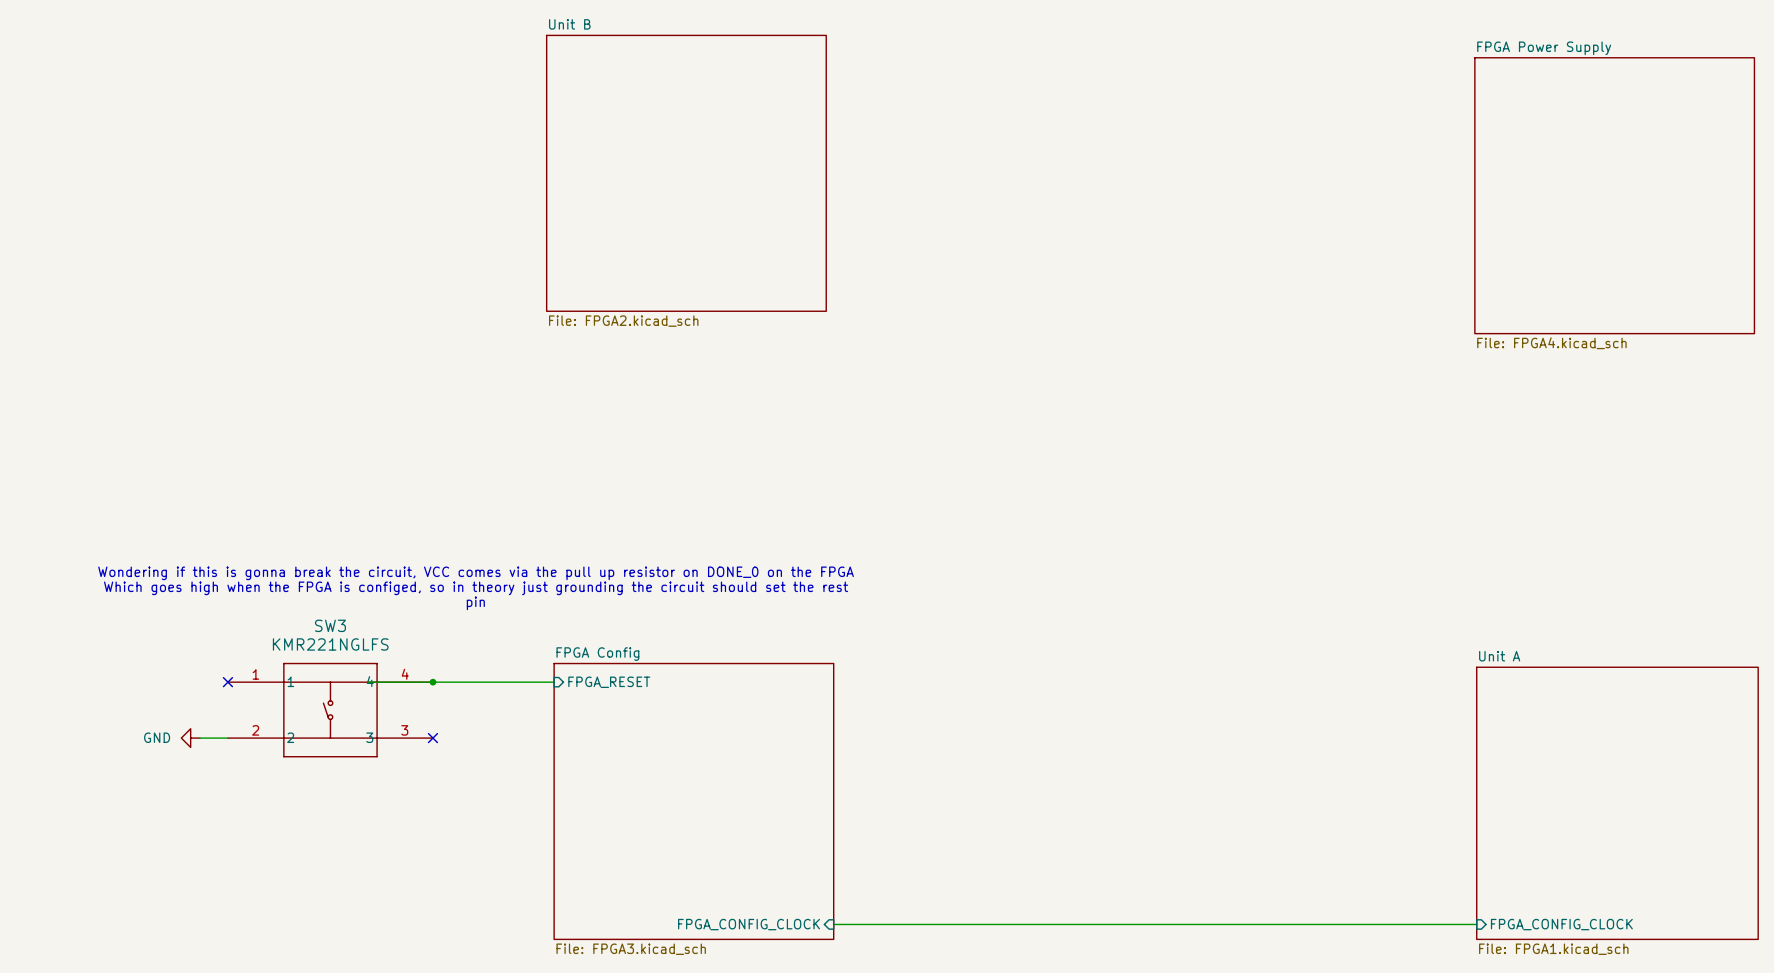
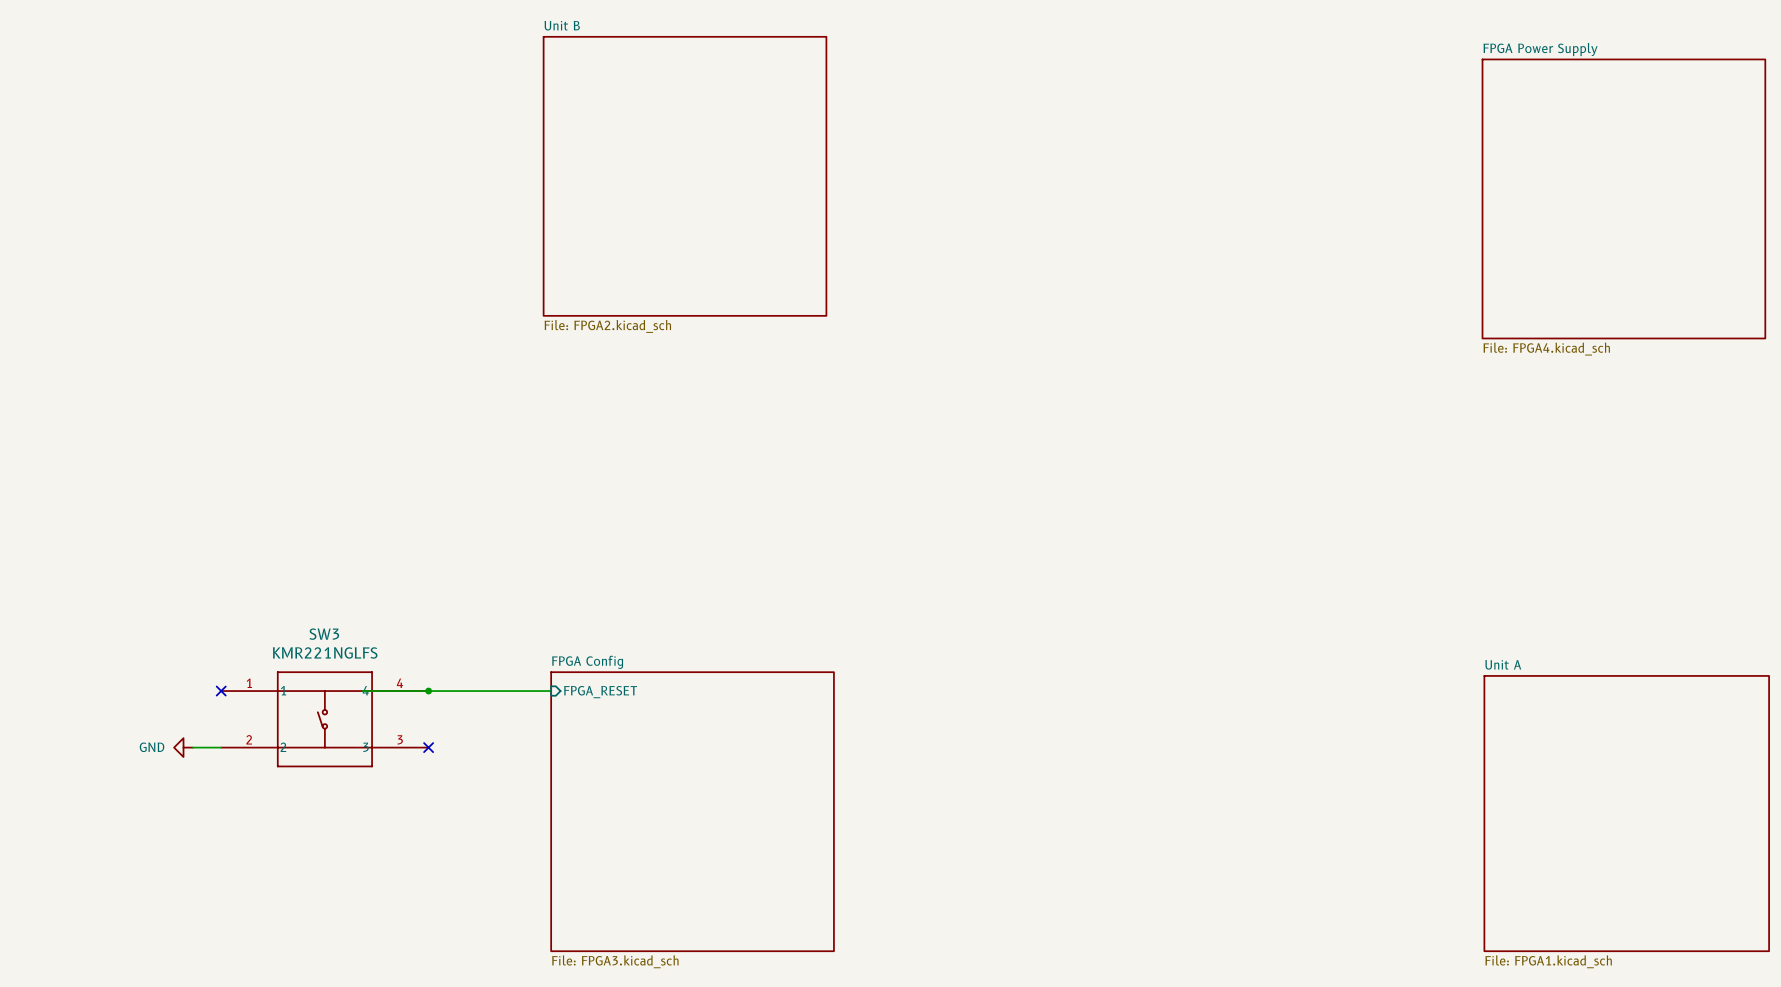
text: Wondering if this is gonna break the circuit, VCC comes via the pull up resistor on DONE_0 on the FPGA (476, 573) -> none
text: Which goes high when the FPGA is configed, so in theory just grounding the circuit should set the rest (476, 588) -> none
text: pin (475, 603) -> none
sheet pin: FPGA_CONFIG_CLOCK (749, 924) -> none
wire: (833, 924) (1476, 924) -> none
sheet pin: FPGA_CONFIG_CLOCK (1561, 924) -> none

